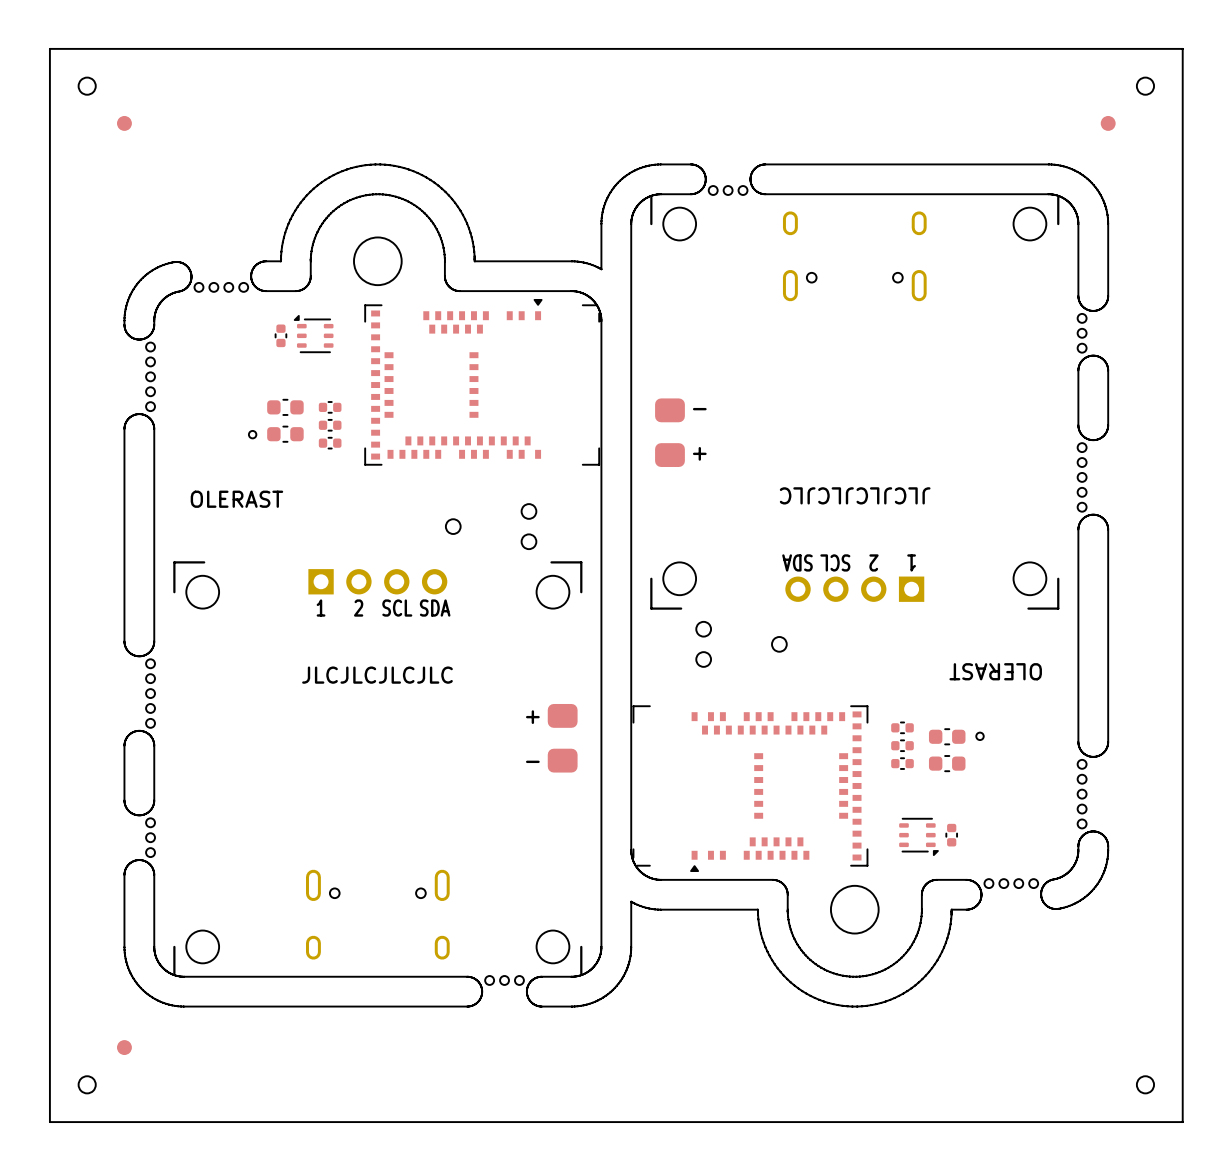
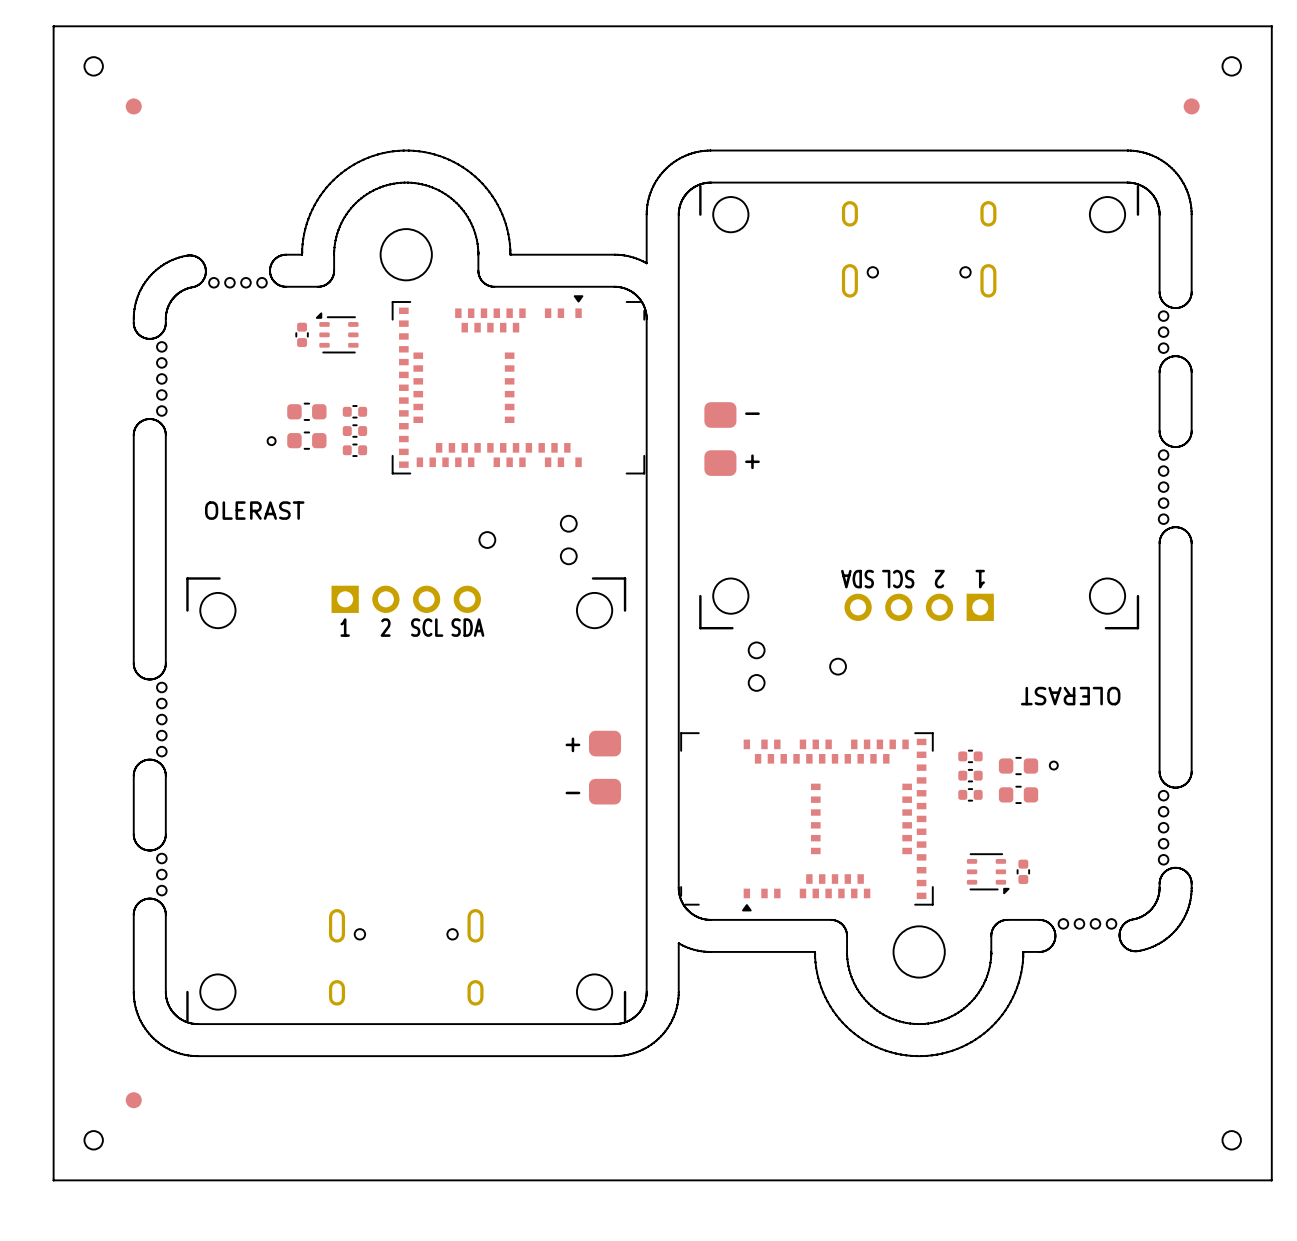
board edge: (690, 164) (701, 168) (705, 179) (701, 189) (690, 194) -> (822, 182) (742, 182)
board edge: (765, 164) (754, 168) (750, 179) (754, 189) (765, 194) -> (822, 150) (742, 150)
part: (713, 190) -> none
part: (728, 190) -> none
part: (743, 190) -> none
text: JLCJLCJLCJLC (855, 495) -> none
text: JLCJLCJLCJLC (377, 675) -> none
board edge: (467, 976) (477, 981) (482, 991) (477, 1002) (467, 1006) -> (582, 1056) (502, 1056)
board edge: (541, 976) (531, 981) (526, 991) (531, 1002) (541, 1006) -> (582, 1024) (502, 1024)
part: (489, 980) -> none
part: (504, 980) -> none
part: (519, 980) -> none

